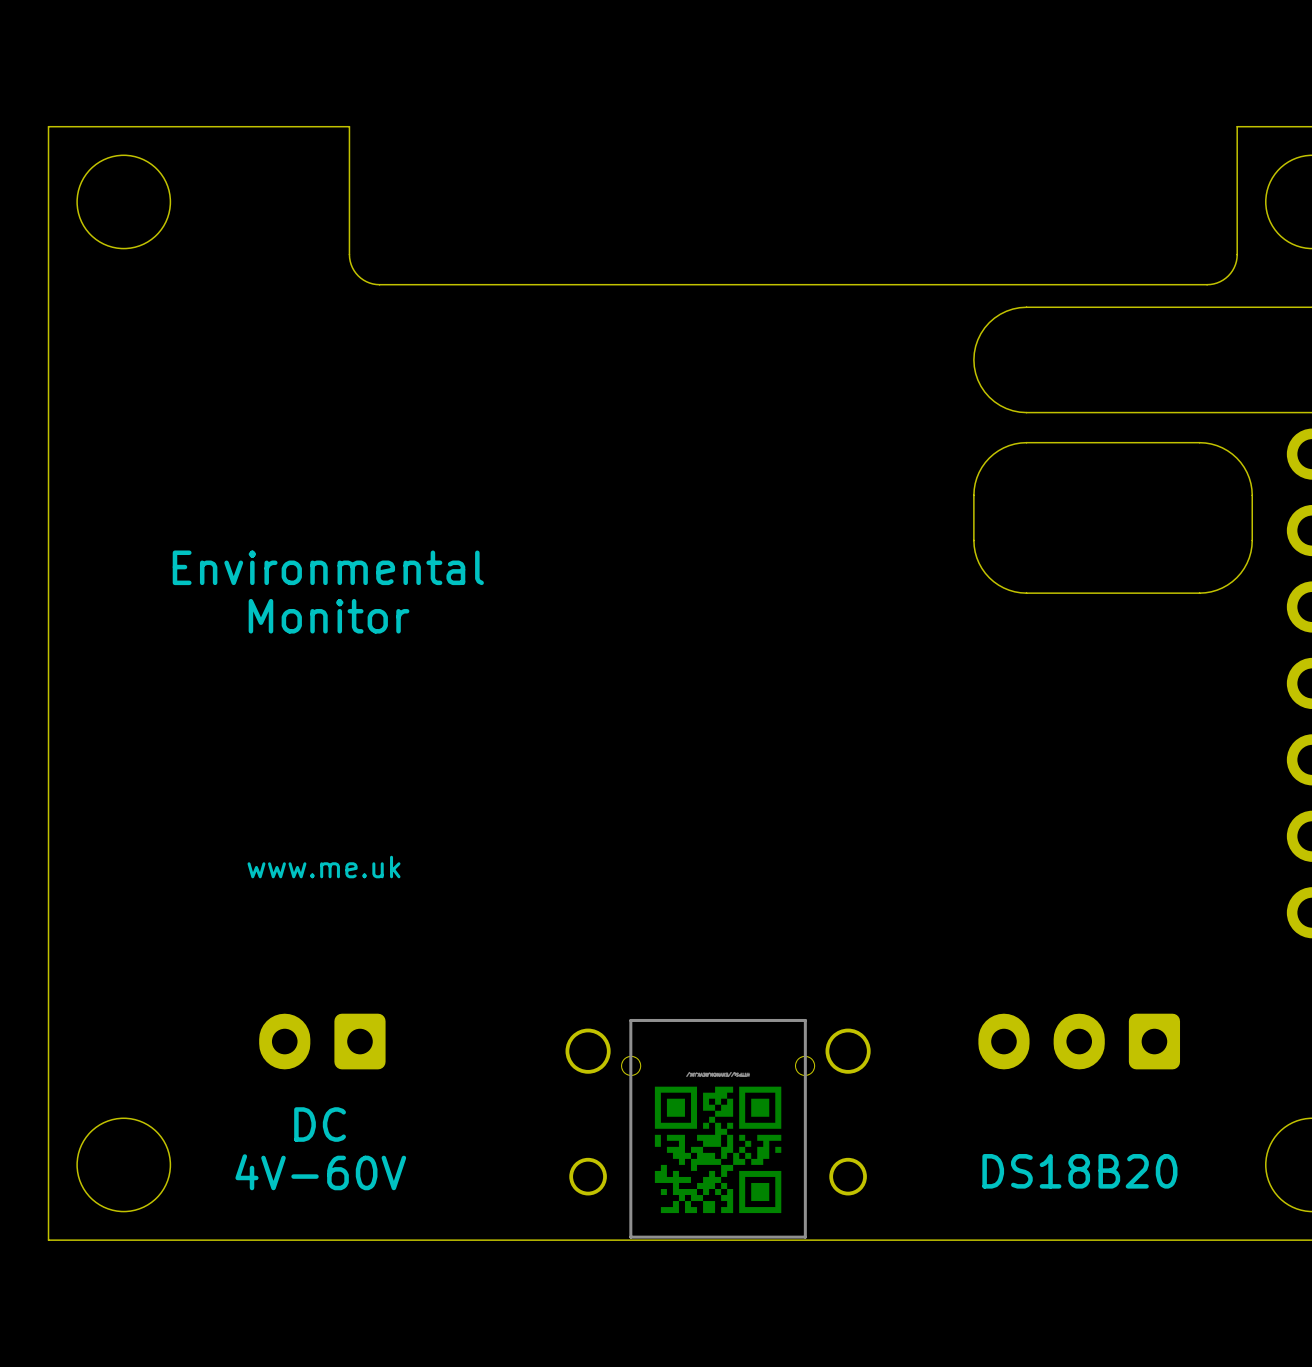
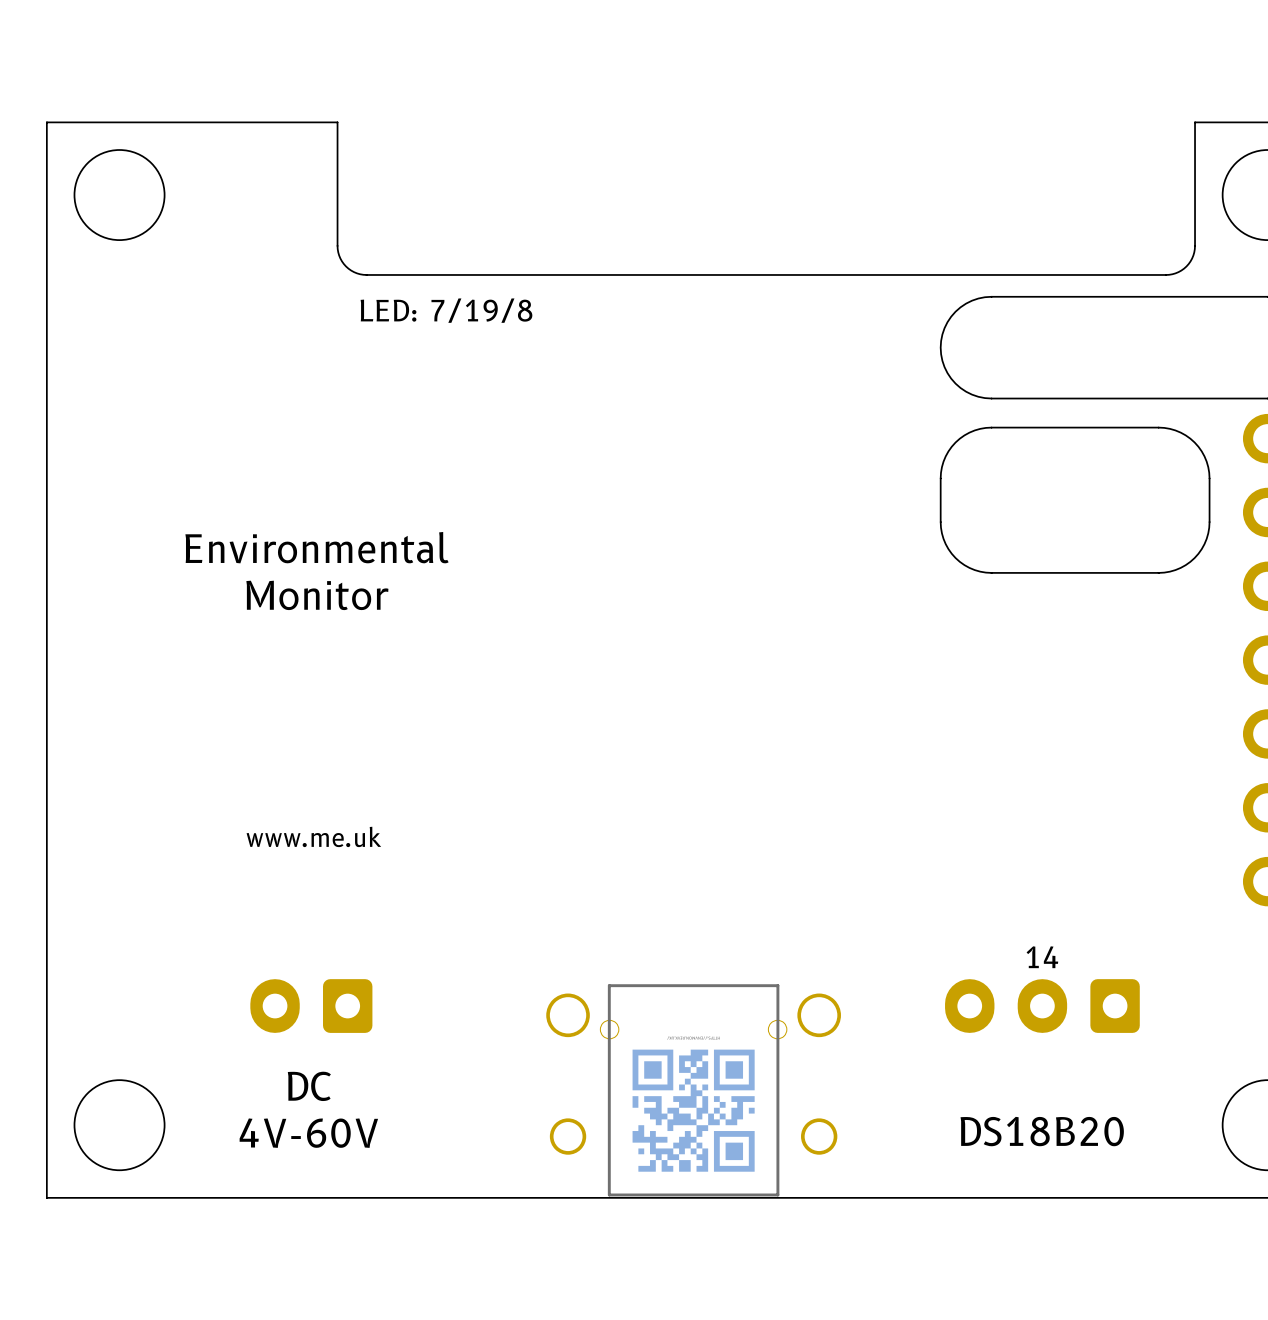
text: none -> LED: 7/19/8 (446, 310)
text: none -> 14 (1042, 957)

